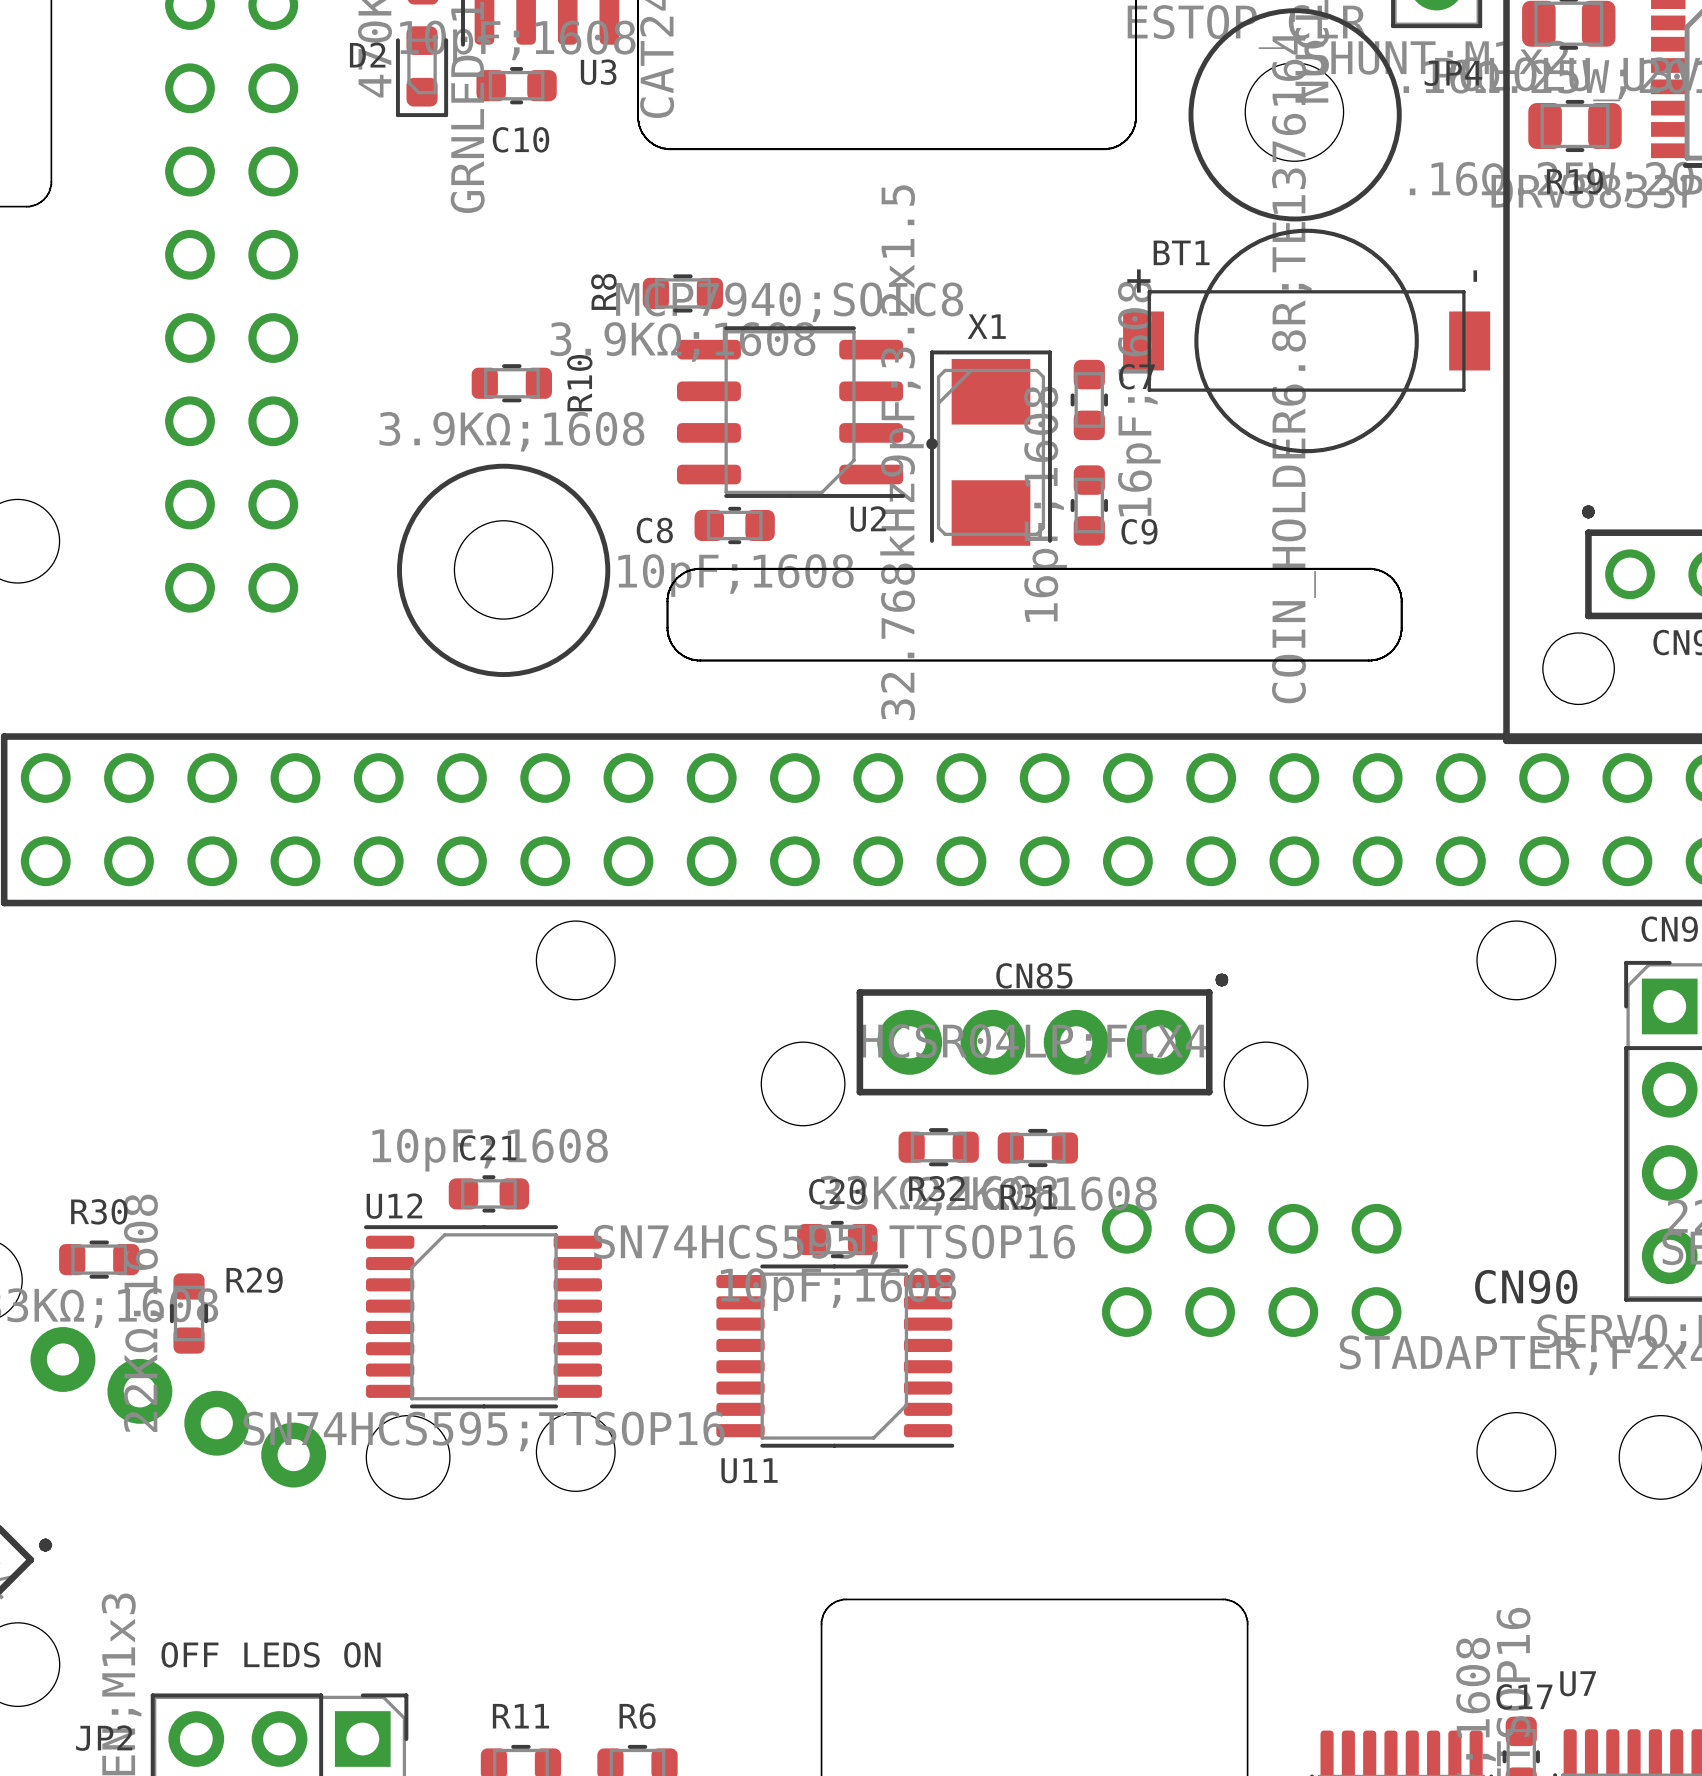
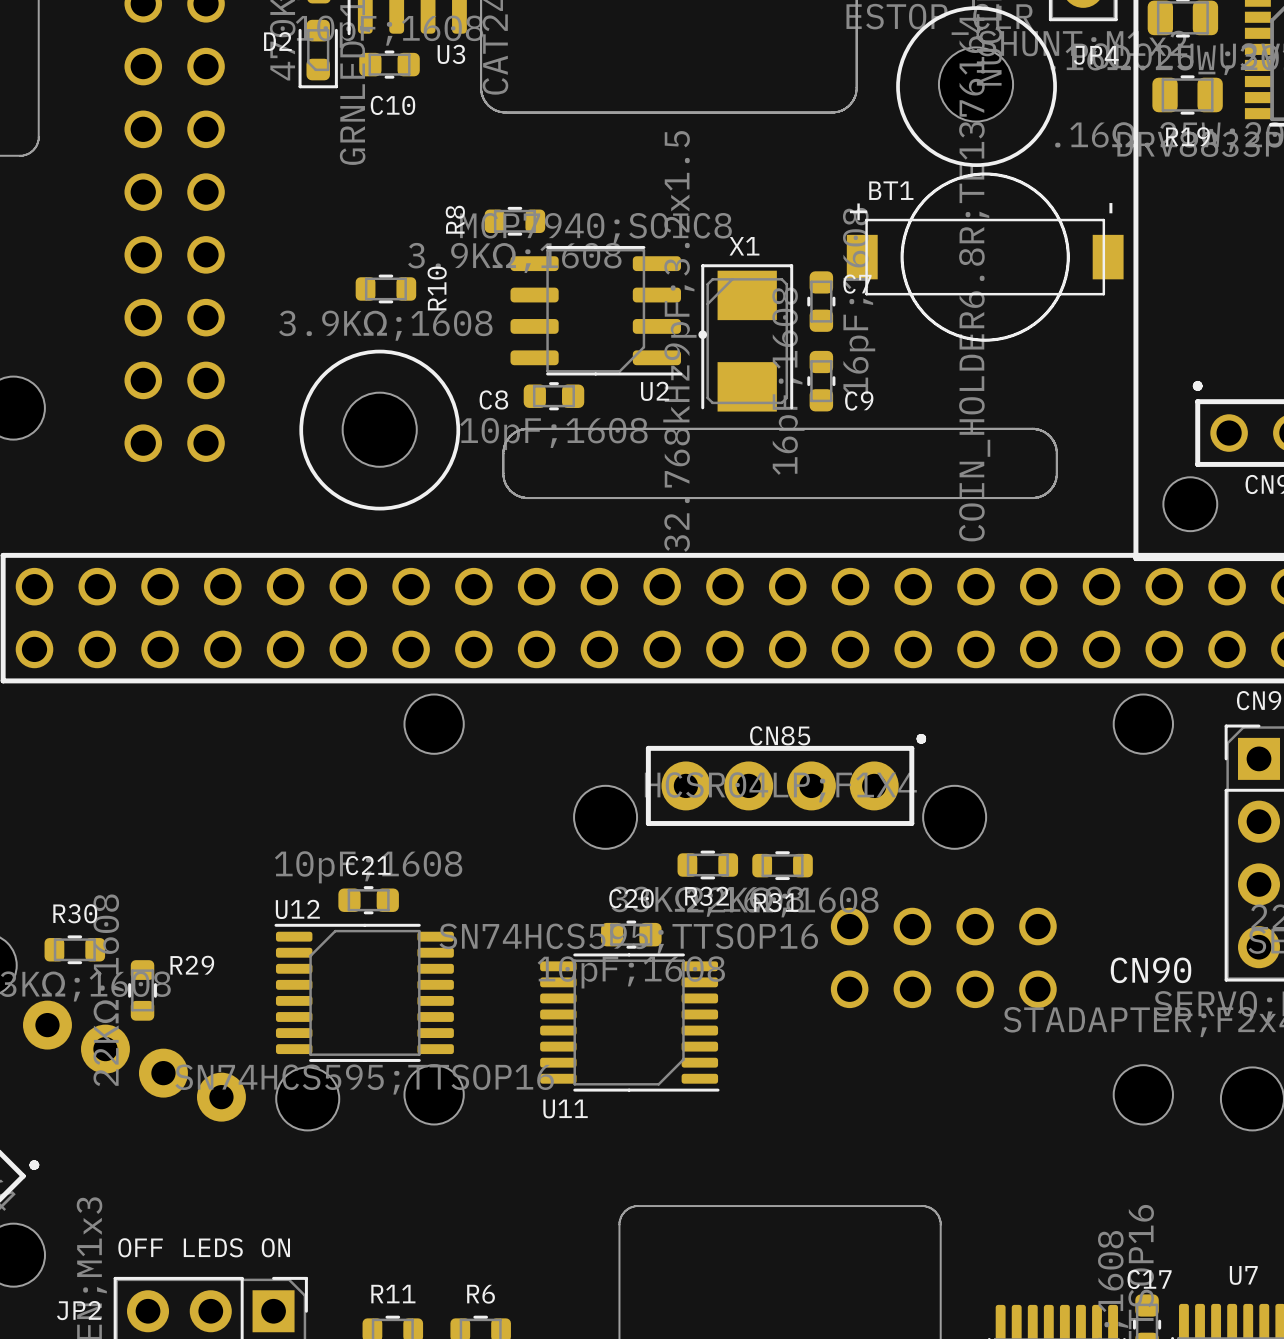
U7 name position: U7 (1578, 1683) -> U7 (1243, 1275)

